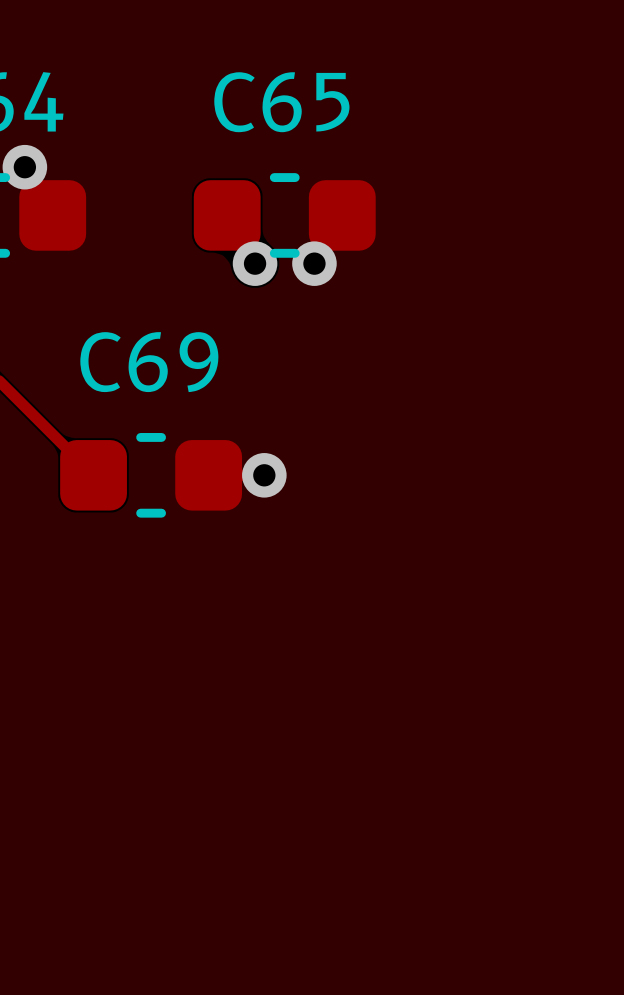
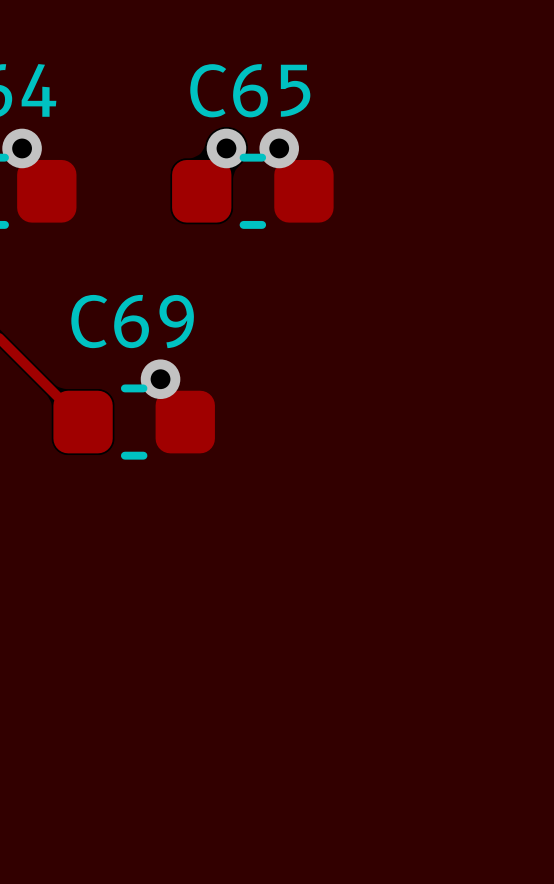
via: none -> (226, 148)
via: none -> (279, 148)
via: (255, 263) -> none
via: (314, 263) -> none
via: none -> (160, 379)
via: (264, 475) -> none

